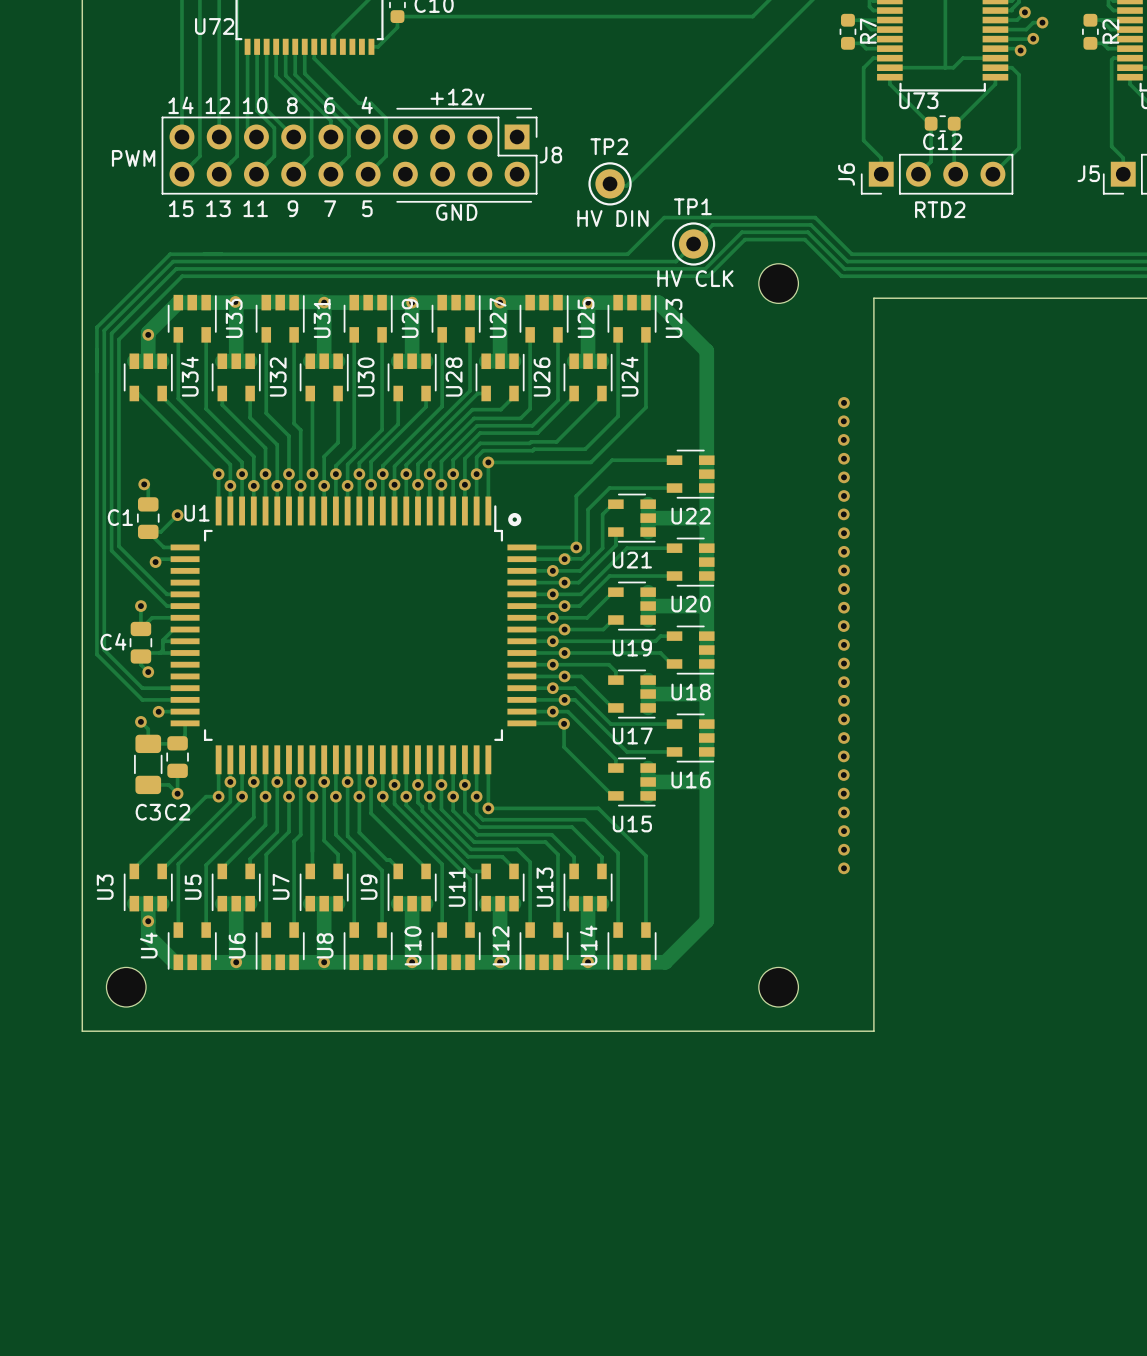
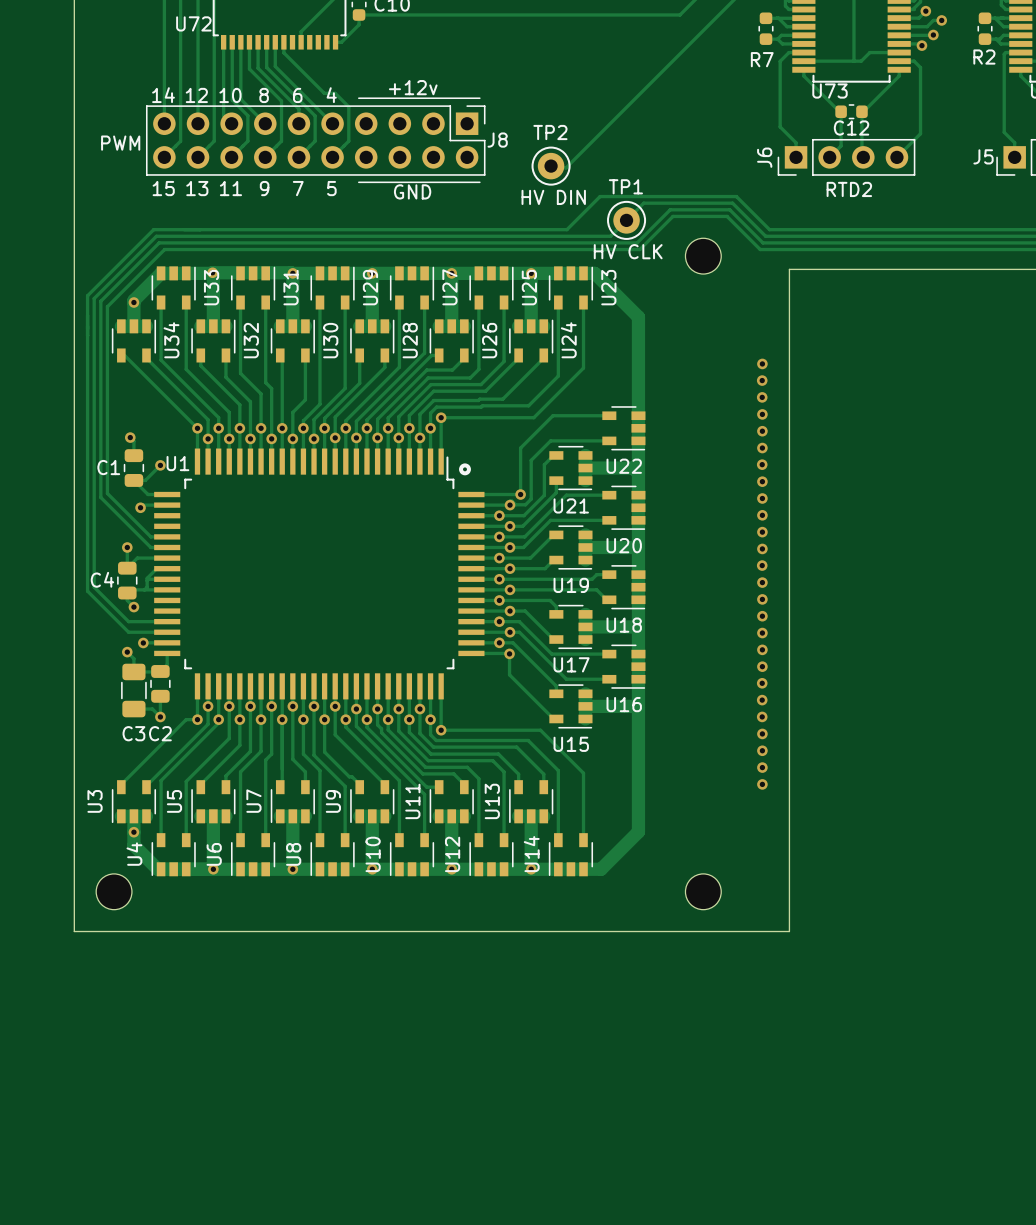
R7 name rotation: 0° (868, 31) -> 90° clockwise (762, 59)
R7 name position: R7 (868, 31) -> R7 (762, 59)
R2 name rotation: 0° (1110, 31) -> 90° clockwise (984, 57)
R2 name position: R2 (1110, 31) -> R2 (984, 57)

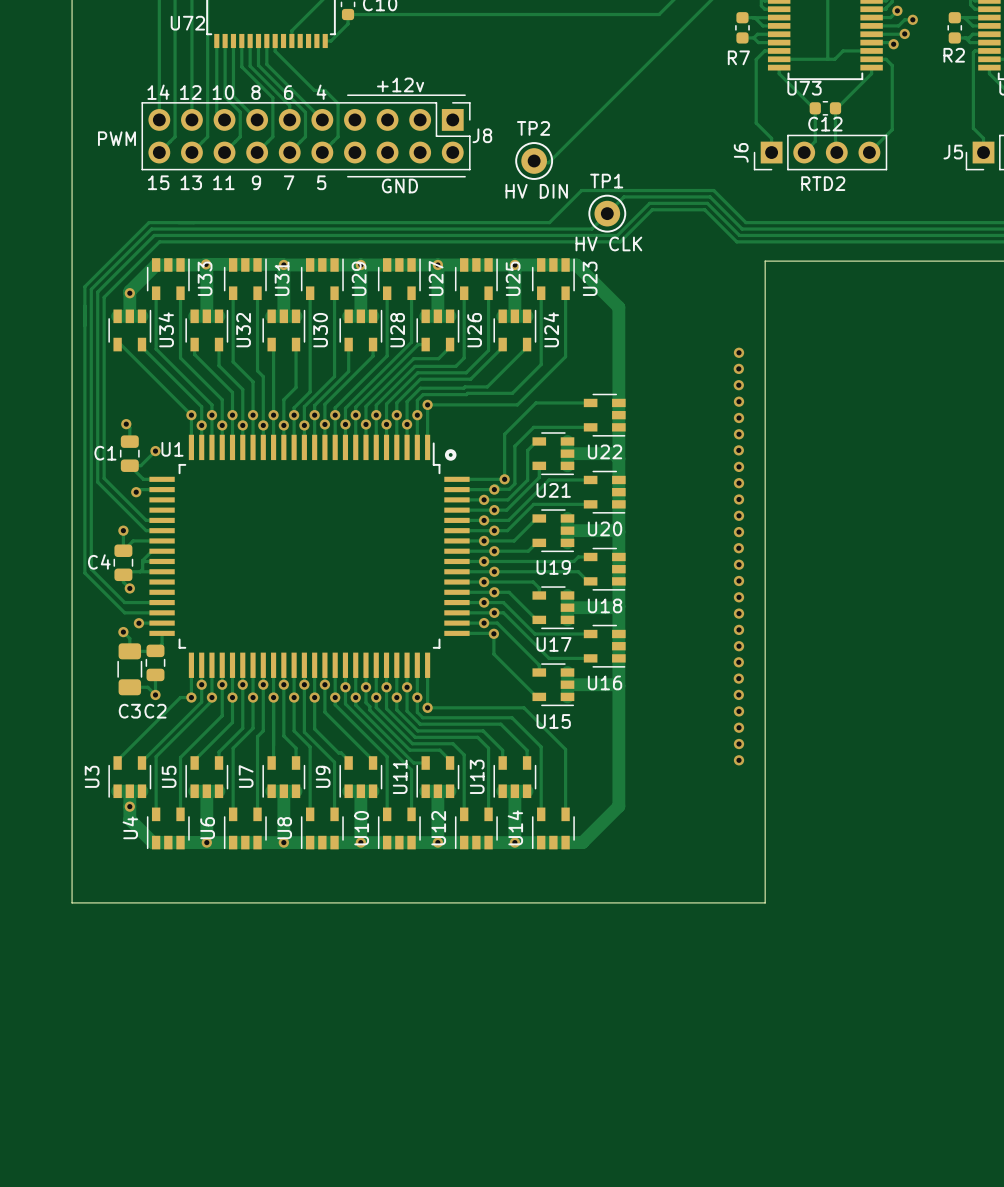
part: (703, 256) -> none
part: (114, 891) -> none
part: (703, 891) -> none

